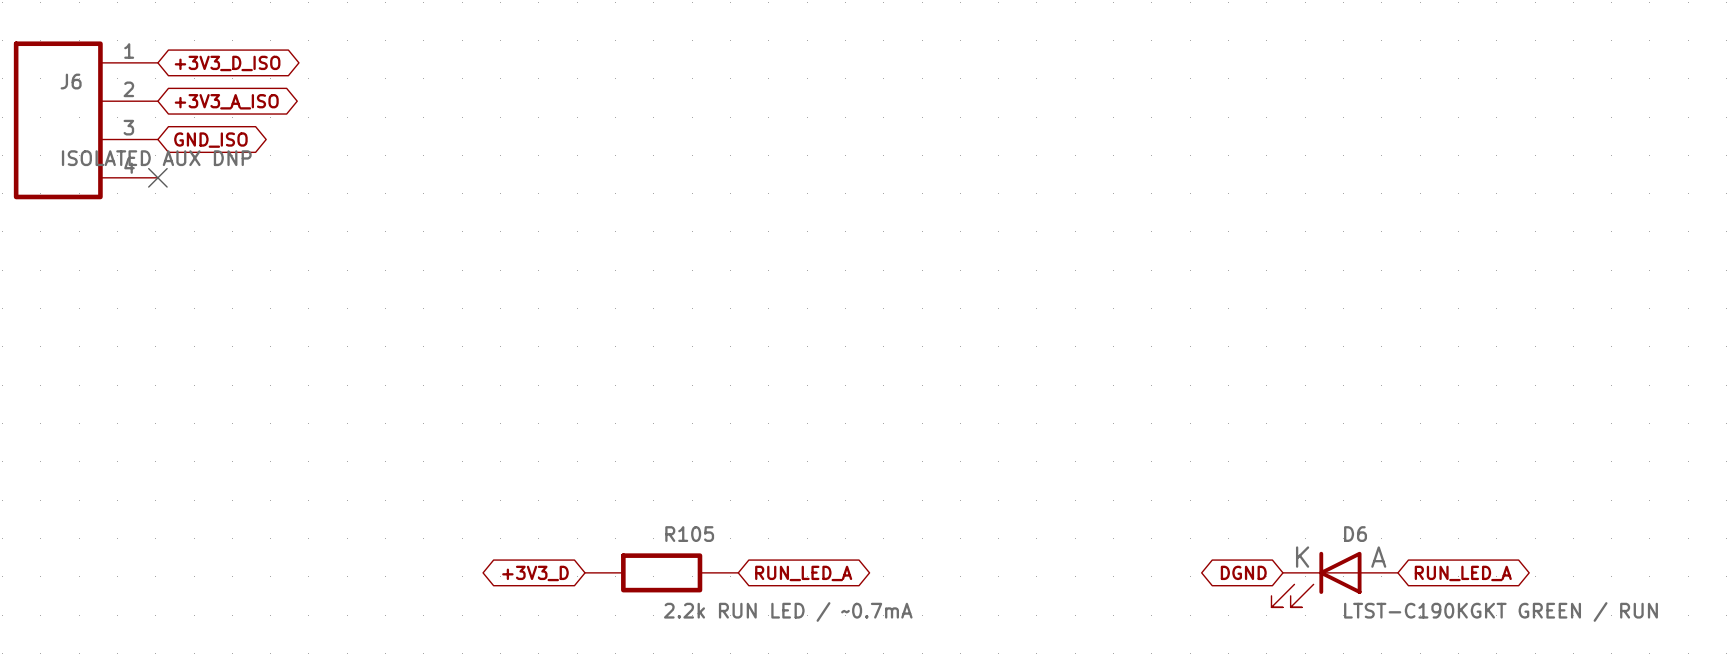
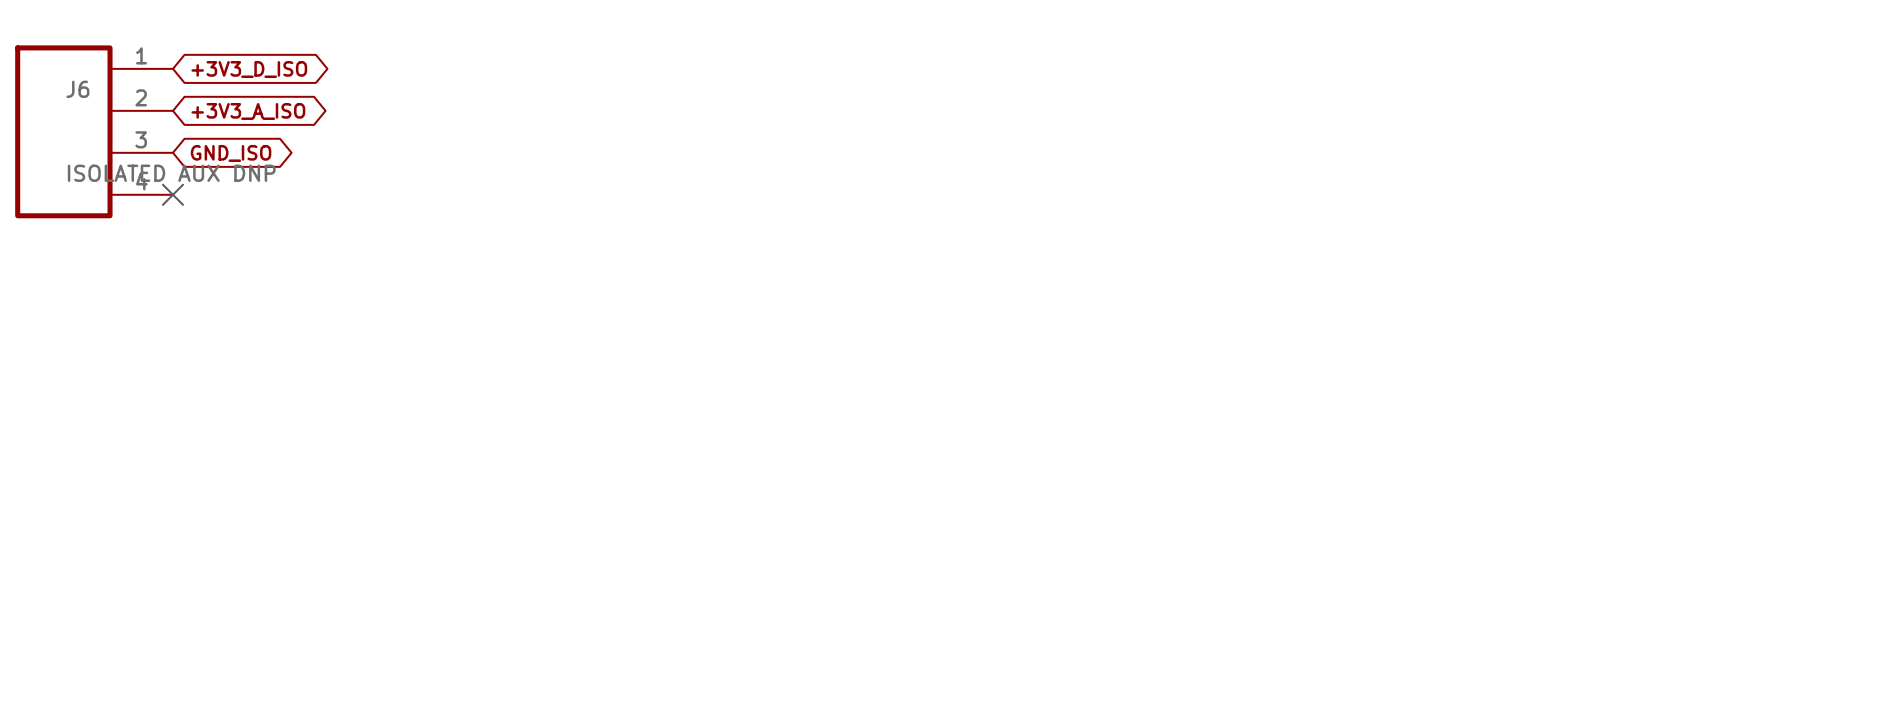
R105: 2.2k RUN LED / ~0.7mA (661, 572) -> none
global label: DGND (1243, 572) -> none
global label: +3V3_D (535, 573) -> none
global label: RUN_LED_A (803, 573) -> none
global label: RUN_LED_A (1463, 573) -> none
D6: LTST-C190KGKT GREEN / RUN (1334, 579) -> none

